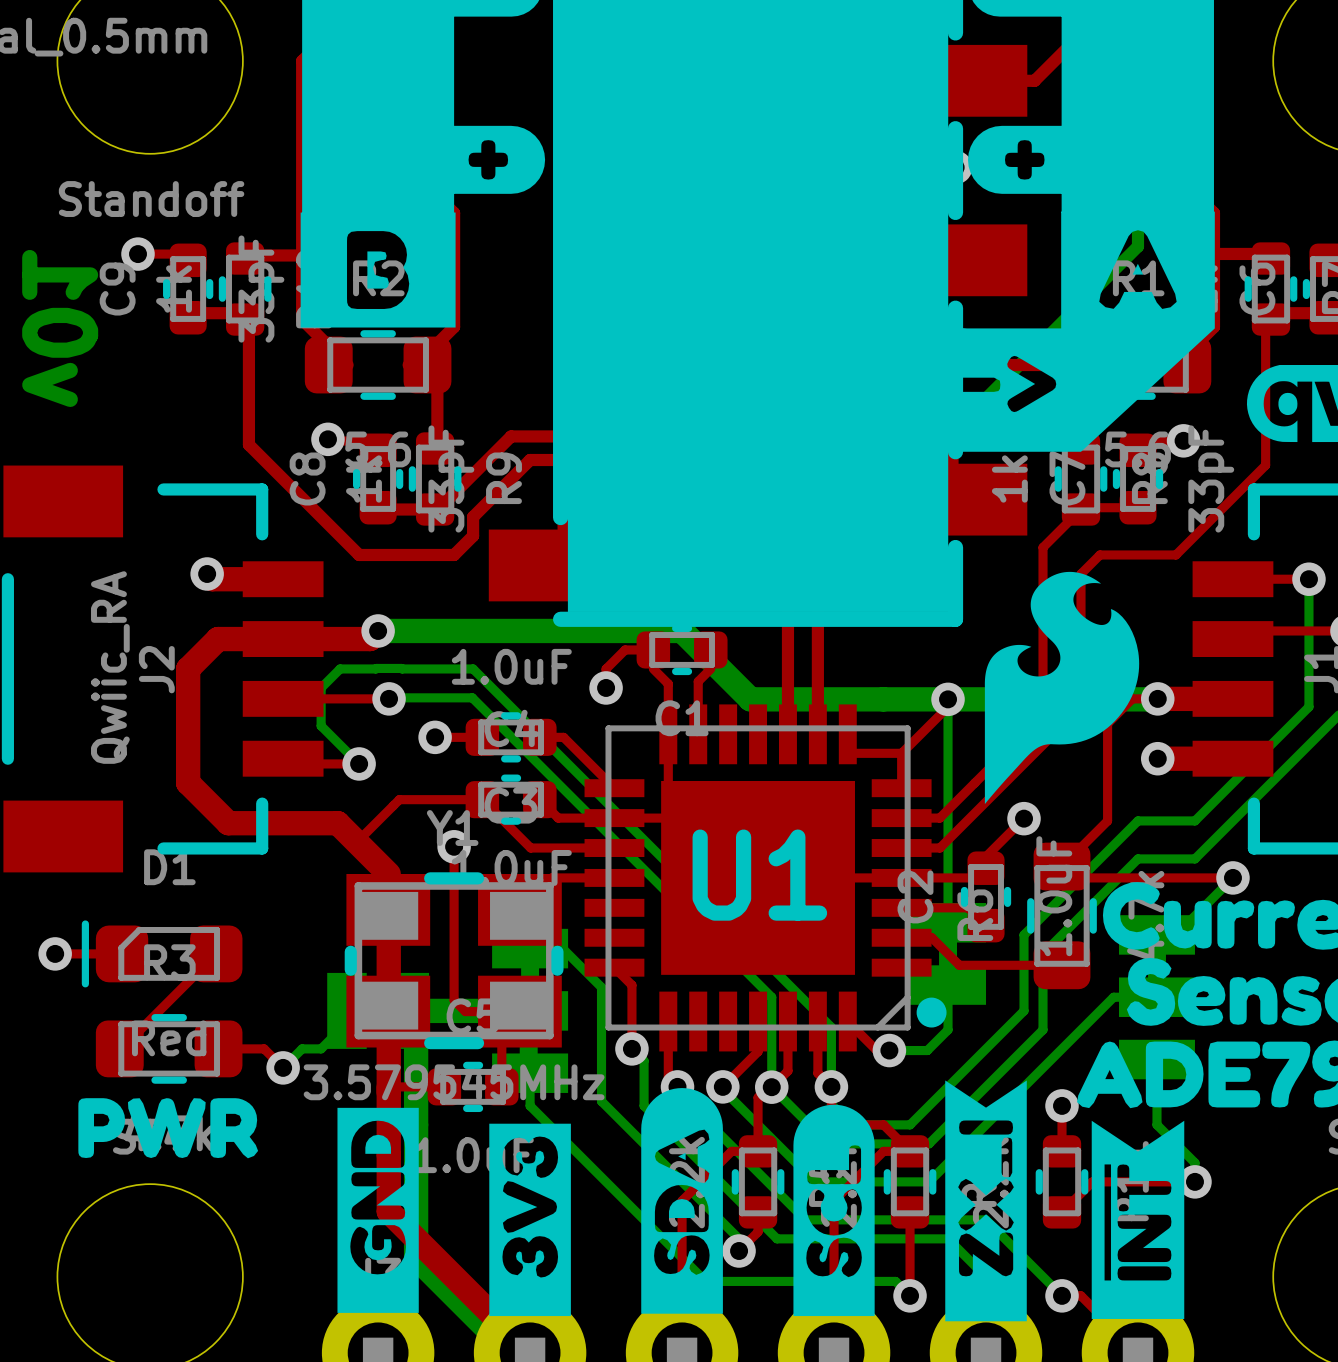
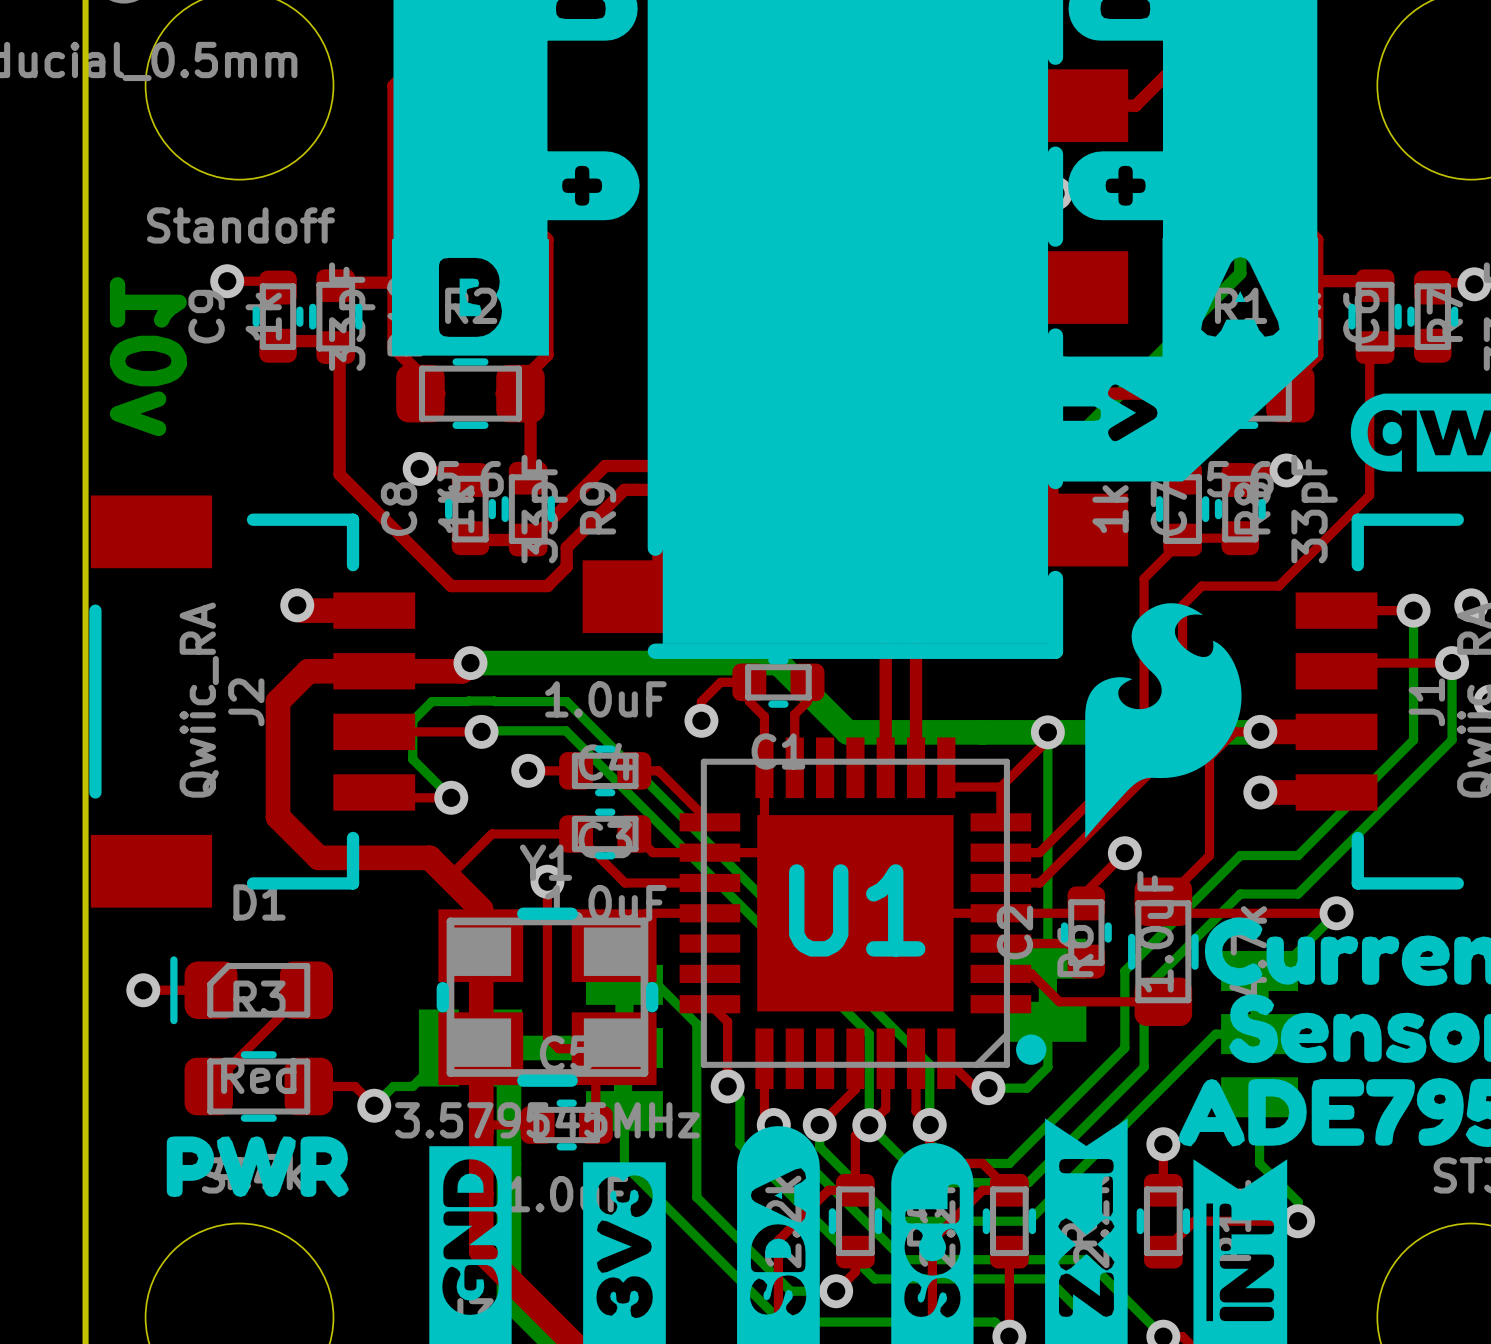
bottom track: (722, 1089) (815, 1181) -> (819, 1127) (819, 1147) (893, 1221) (913, 1221)
bottom track: (601, 1101) (739, 1238) (739, 1250) -> (696, 1139) (696, 1197) (790, 1291) (809, 1291)
bottom track: (530, 1105) (705, 1281) -> (624, 1144) (624, 1164) (781, 1322) (802, 1322)

